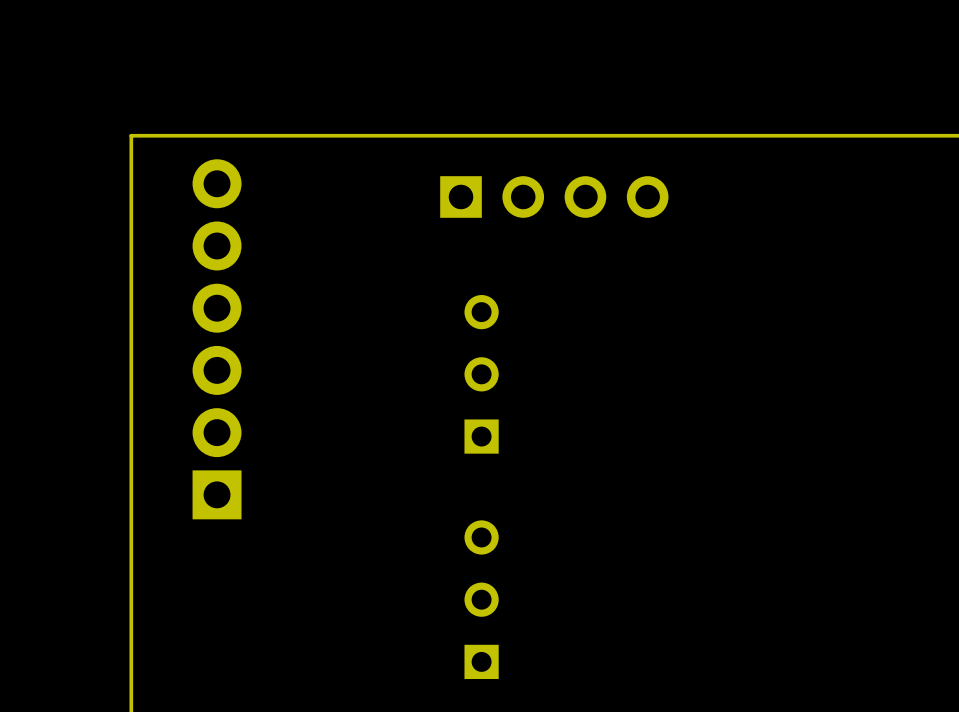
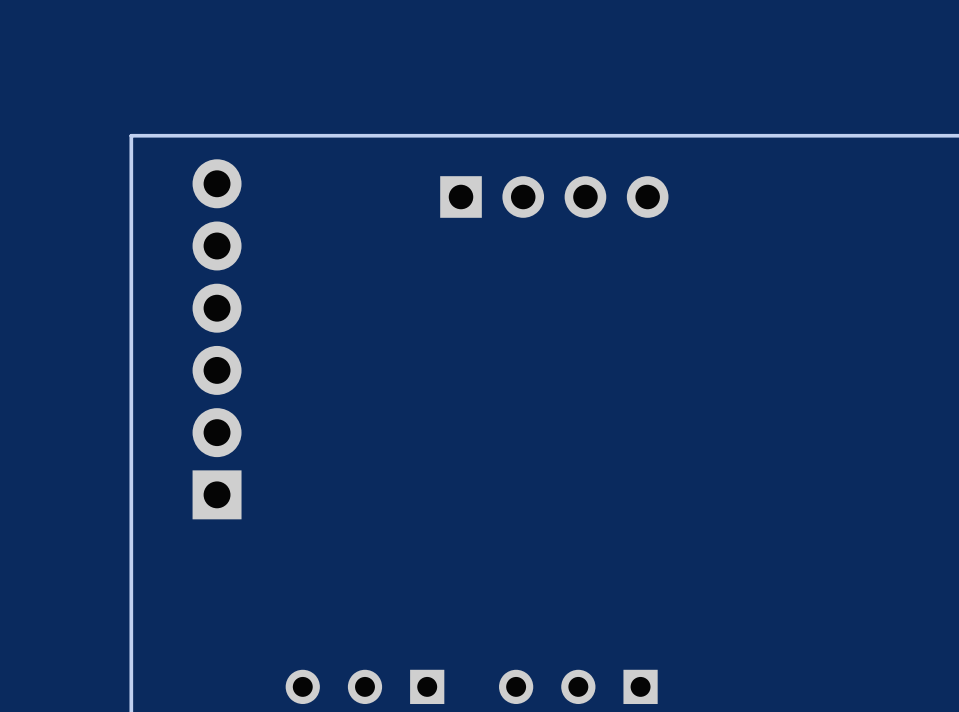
part: (481, 374) -> none
part: (481, 599) -> none
part: none -> (364, 686)
part: none -> (578, 686)

